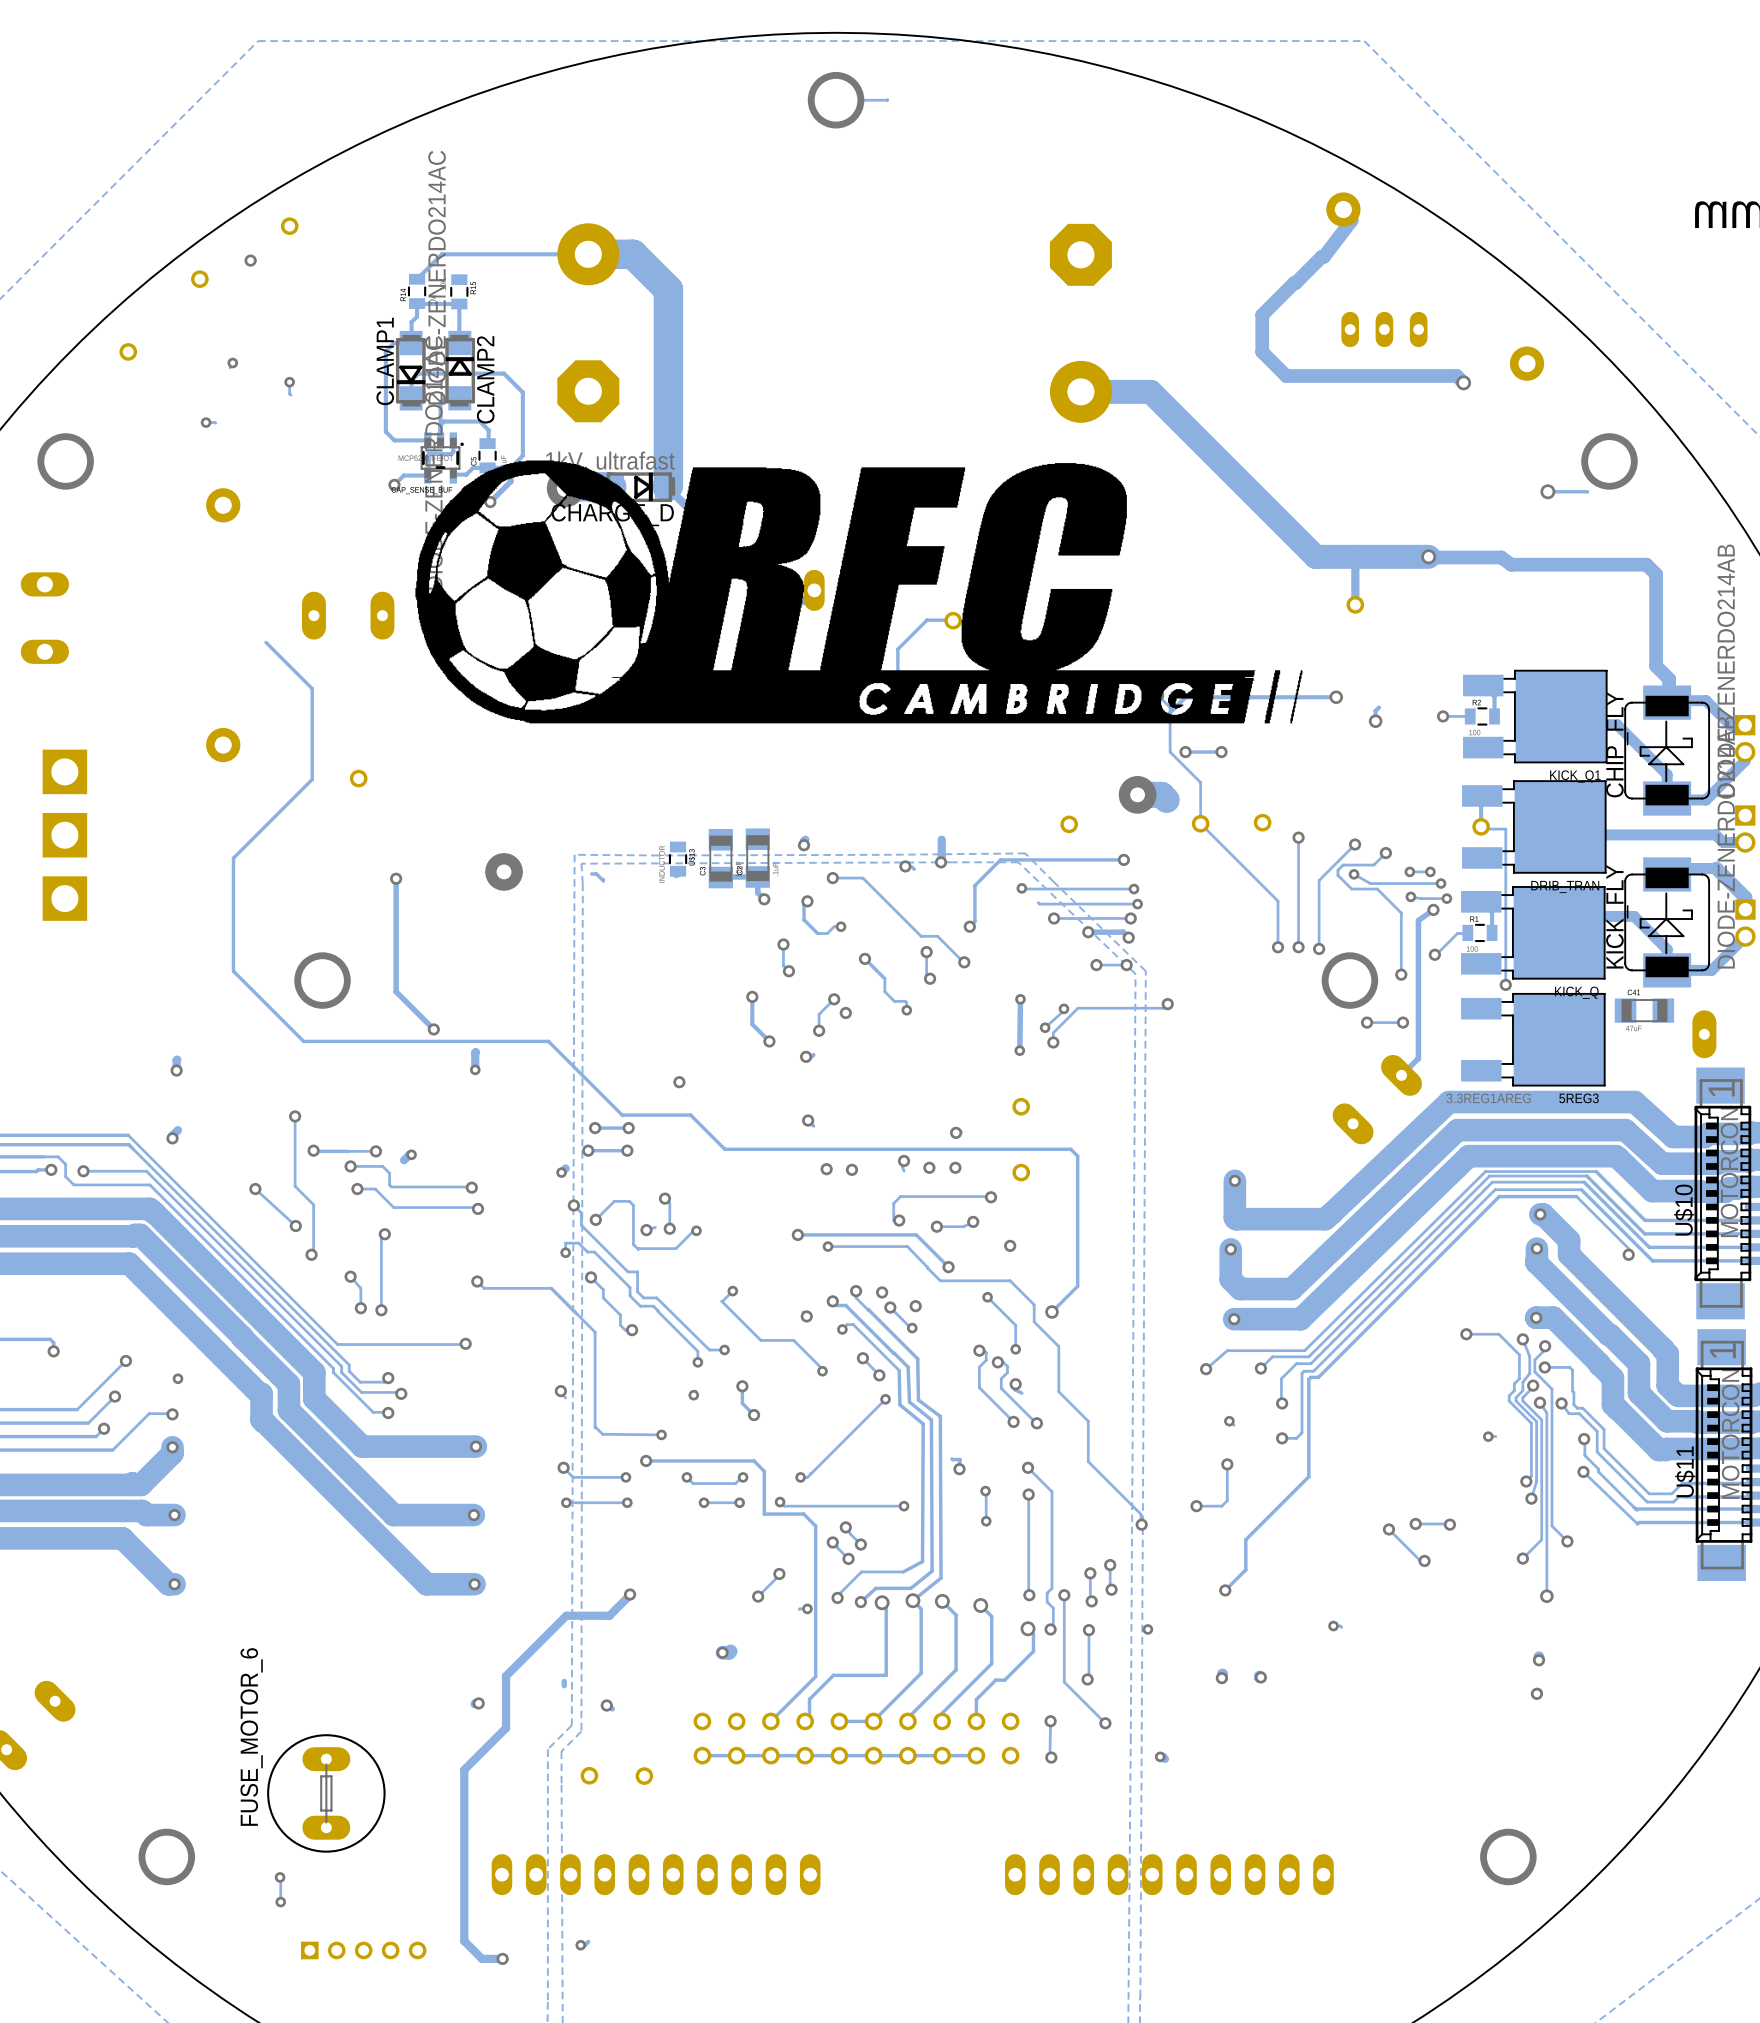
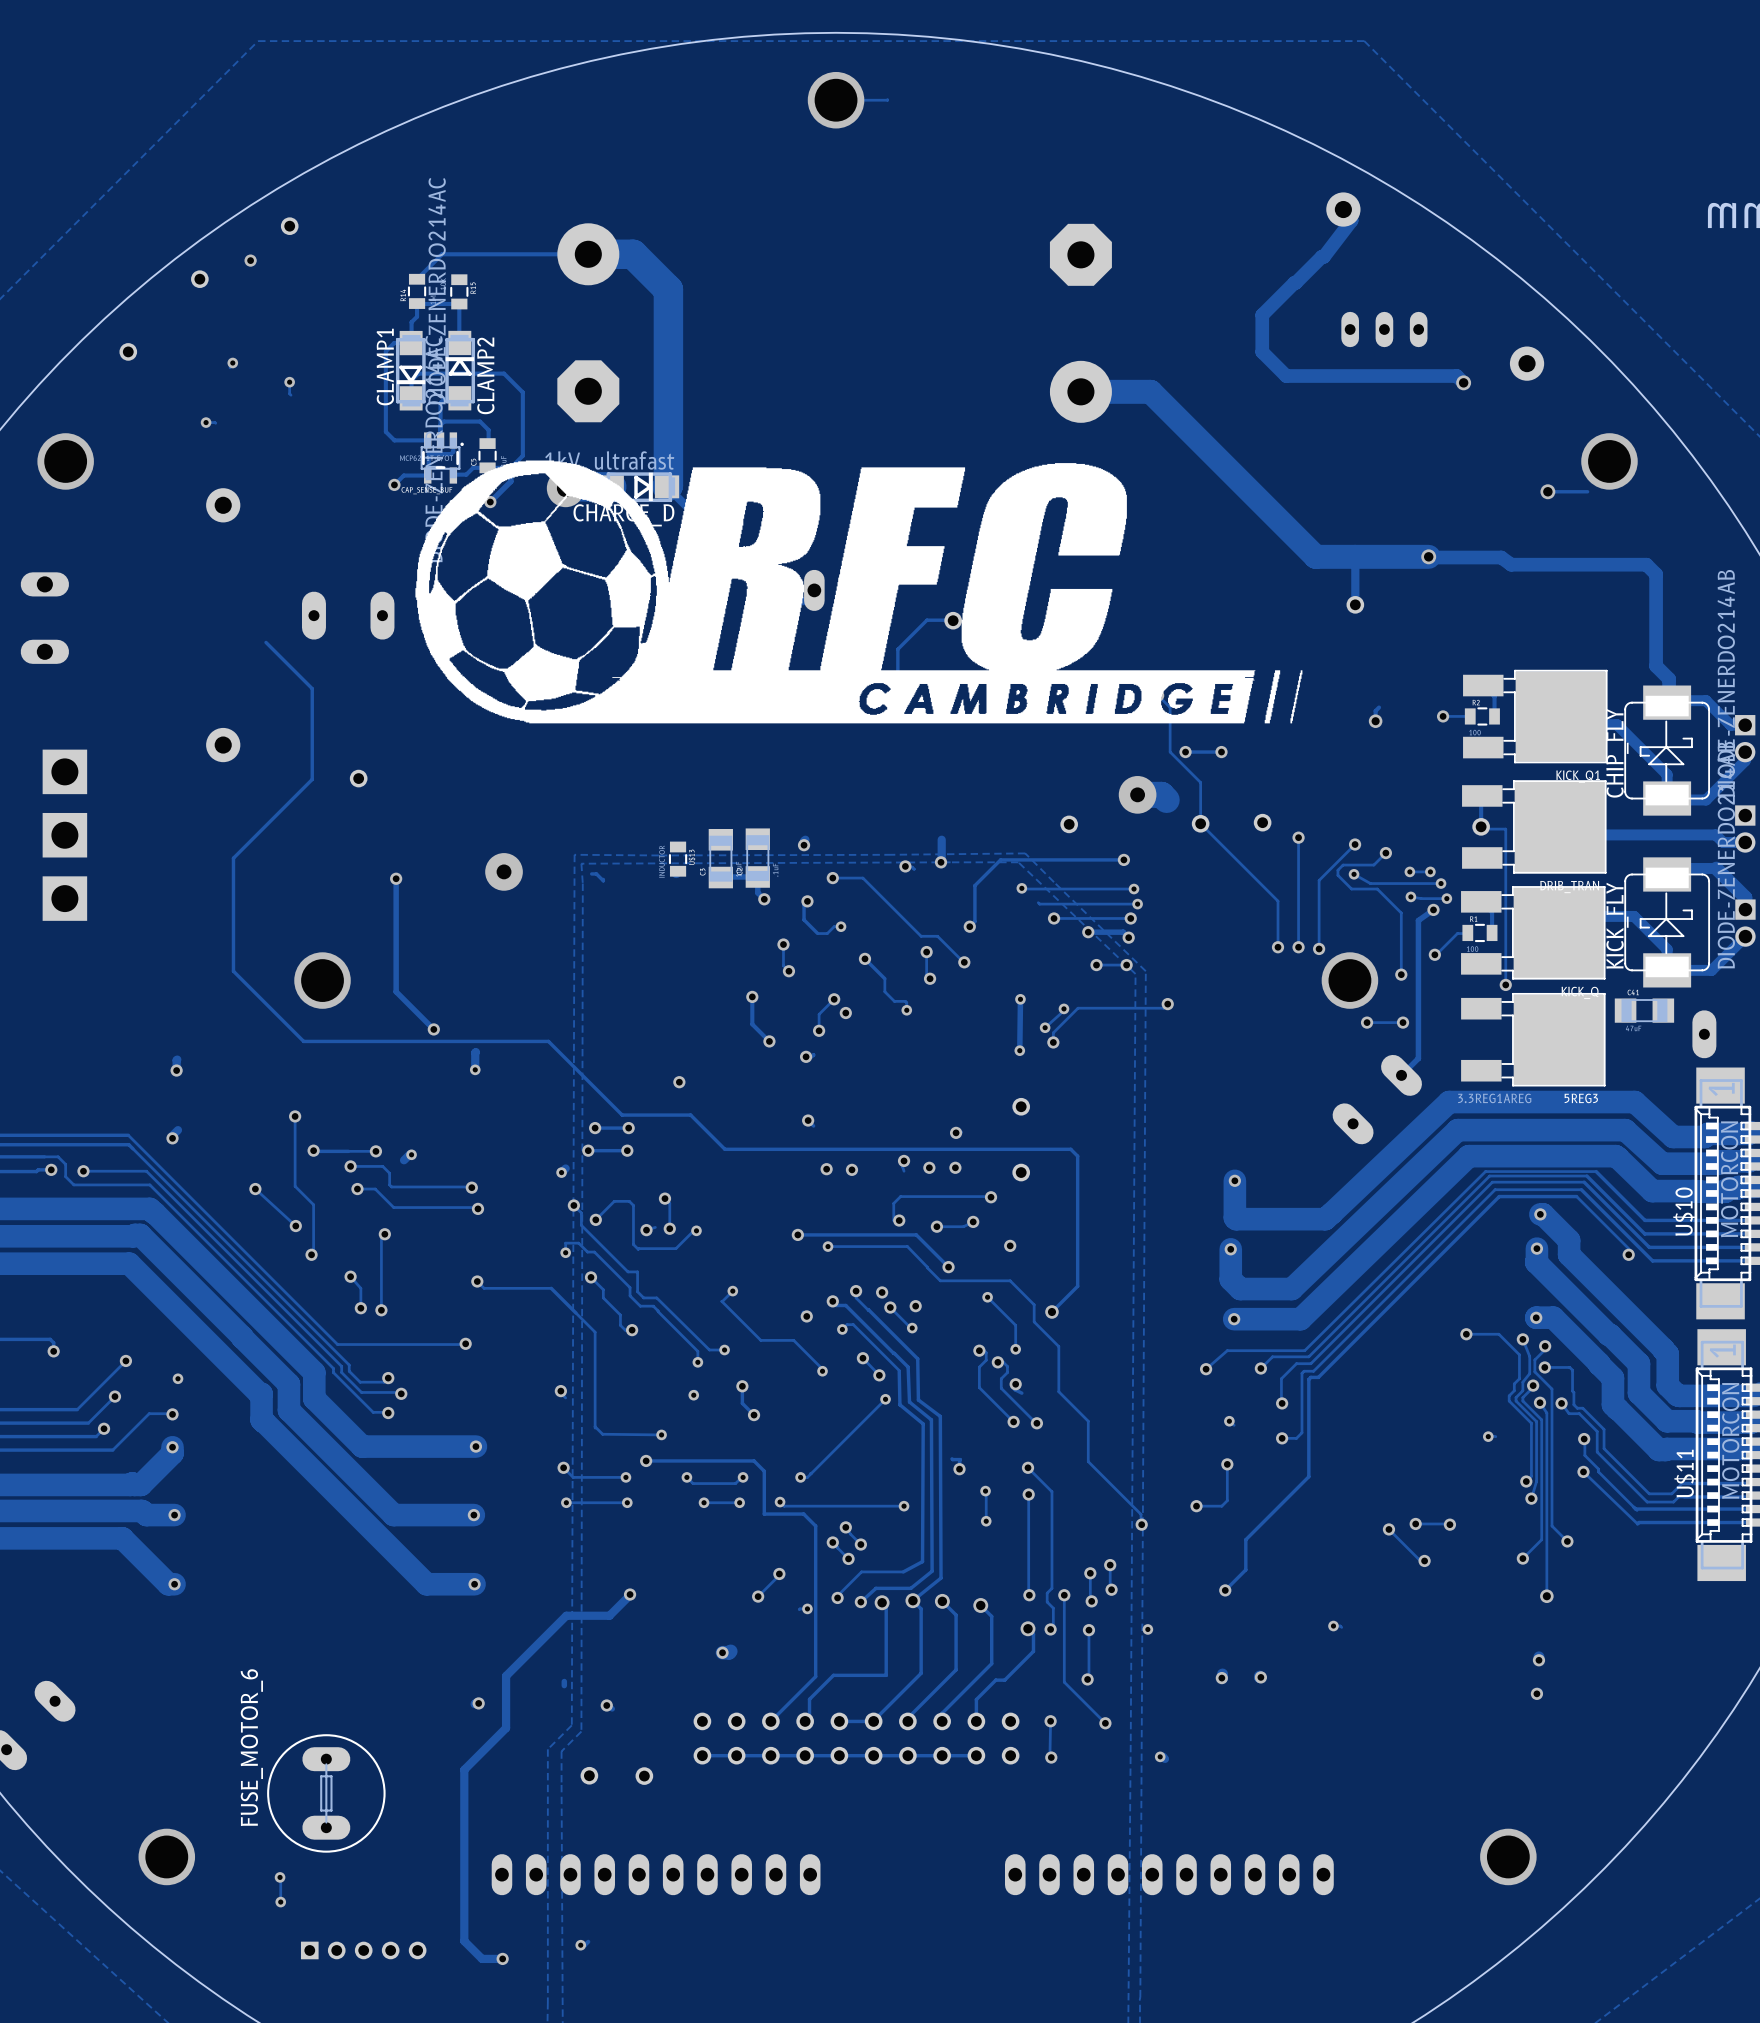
track: (1336, 697) (1185, 697) (1170, 712) -> none
via: (1336, 697) -> none

